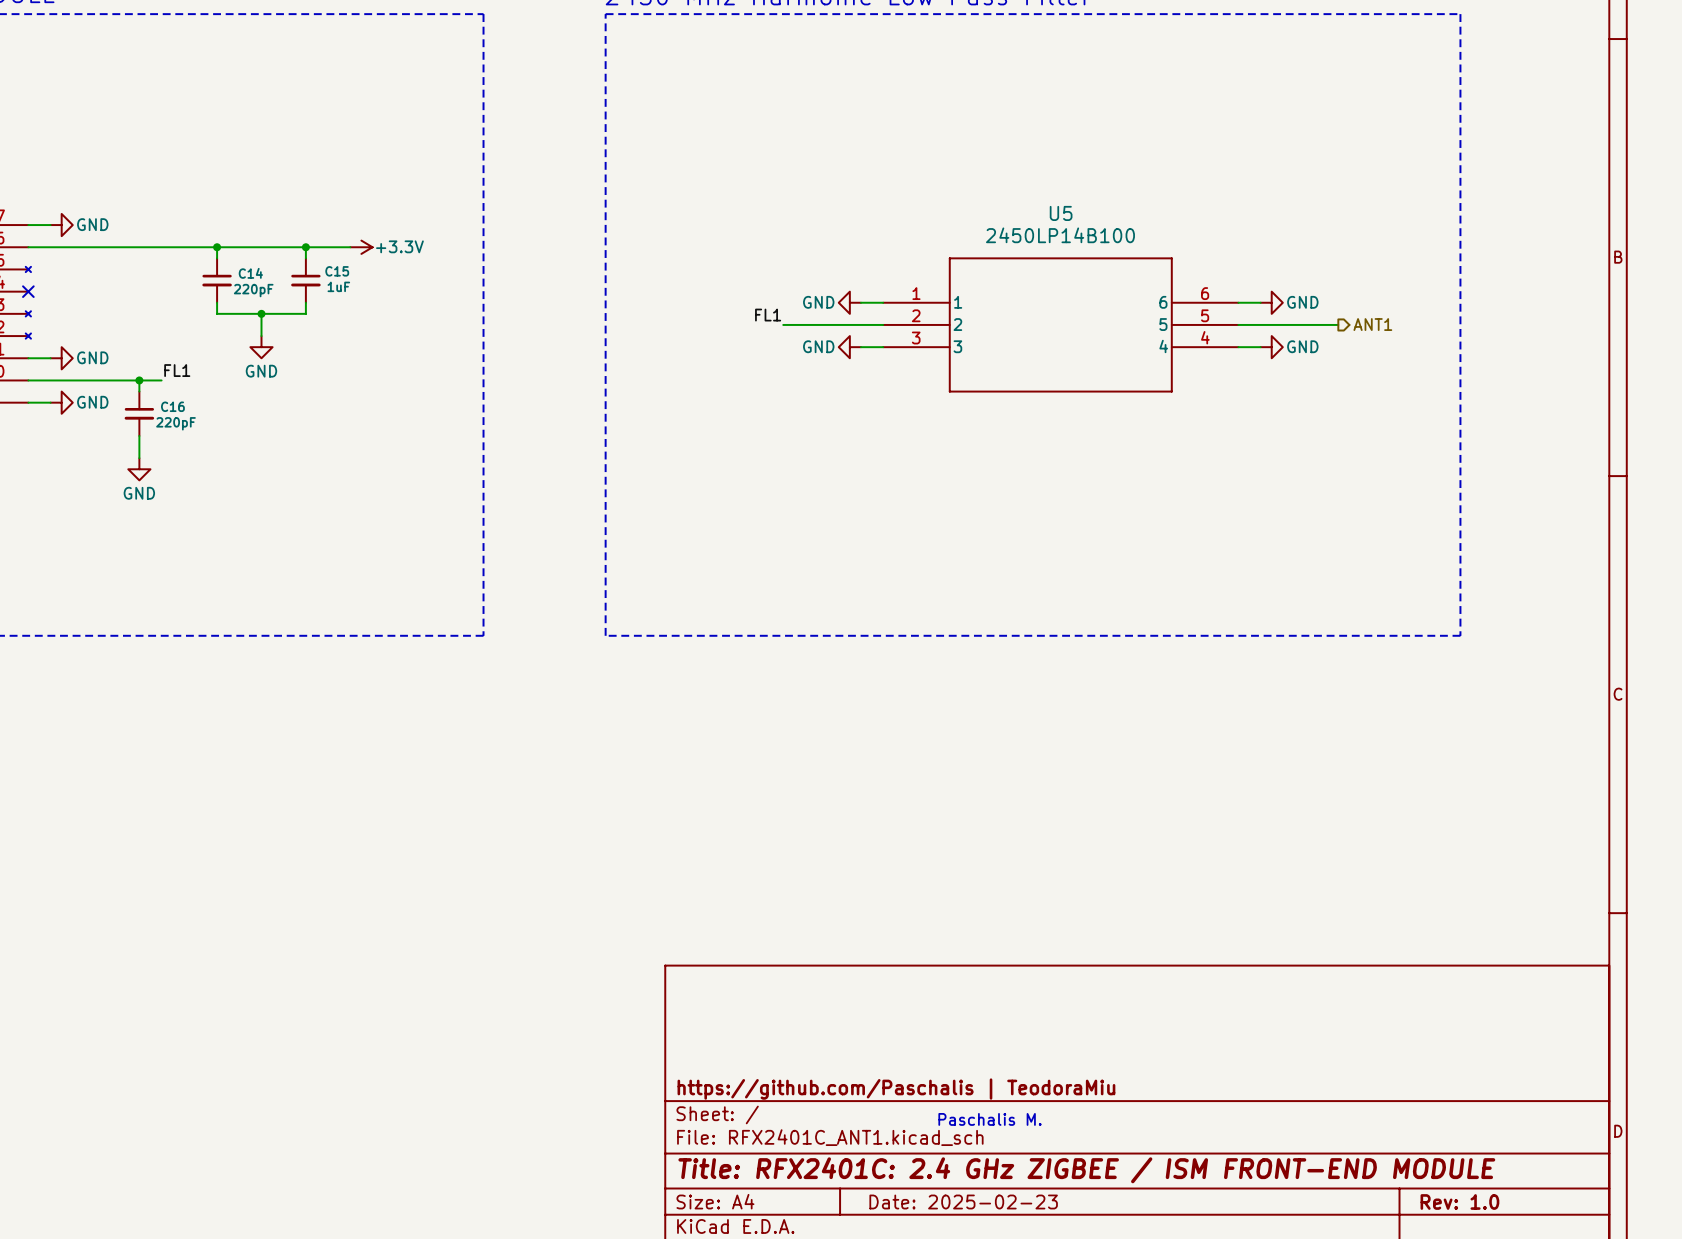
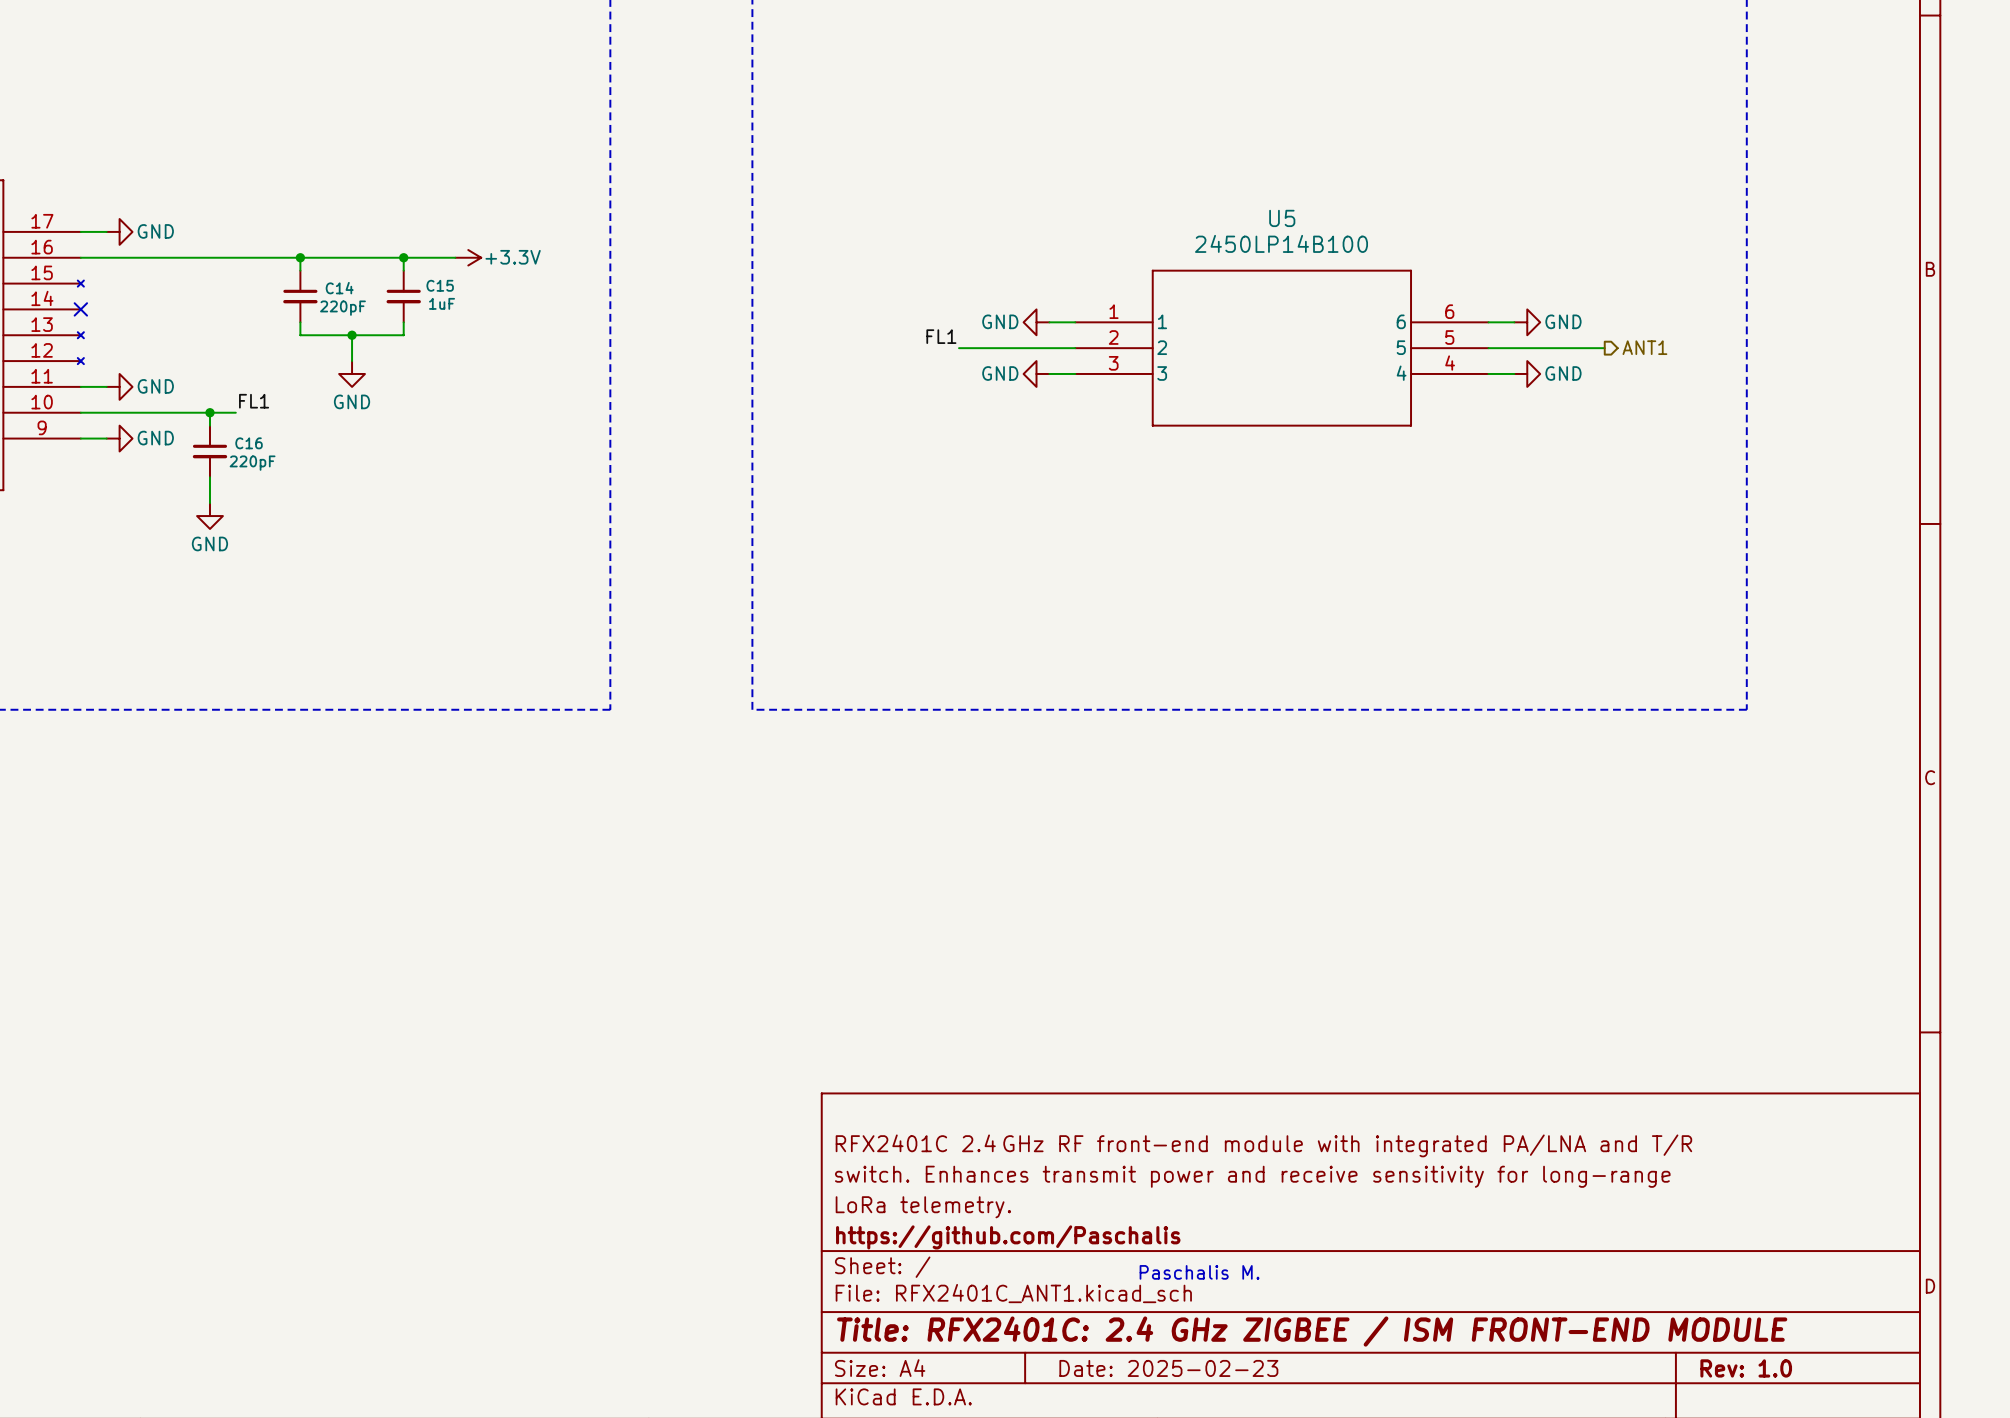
title block: none -> RFX2401C 2.4 GHz RF front-end module with integrated PA/LNA and T/R (1263, 1145)
title block: none -> switch. Enhances transmit power and receive sensitivity for long-range (1252, 1176)
title block: none -> LoRa telemetry. (923, 1207)
title block: https://github.com/Paschalis | TeodoraMiu (896, 1089) -> https://github.com/Paschalis (1008, 1237)

